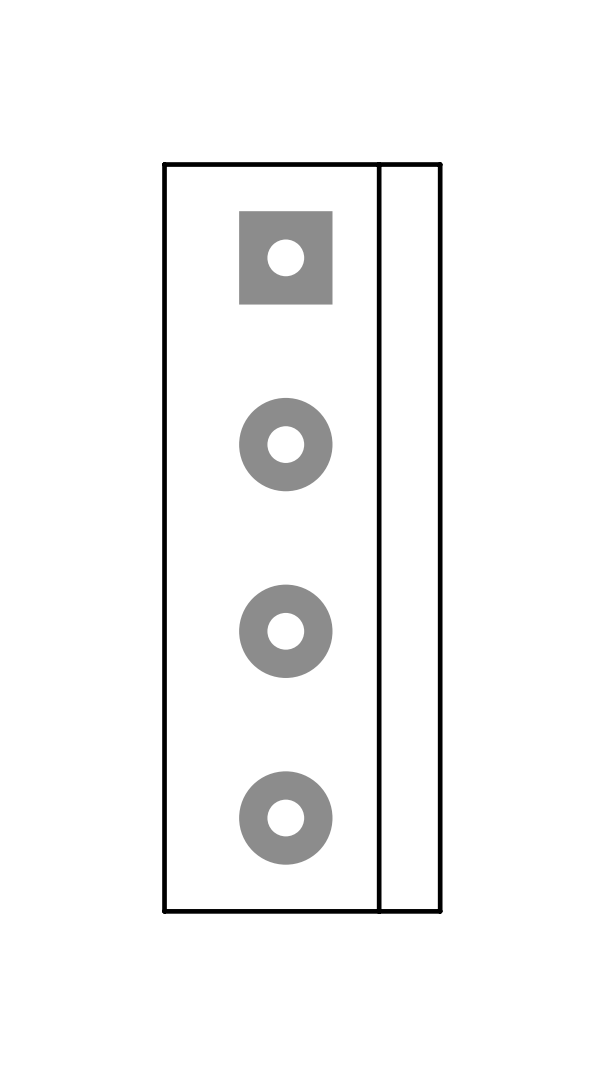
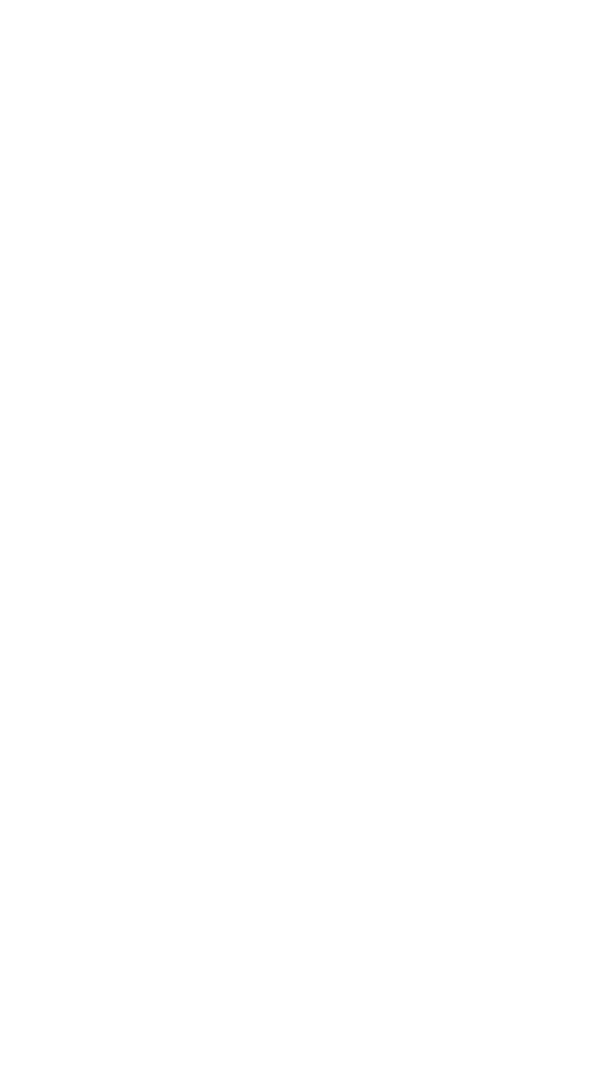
part: (302, 537) -> none

